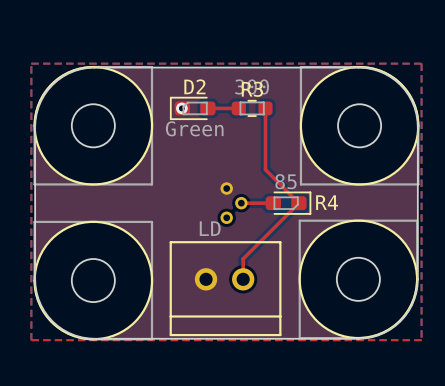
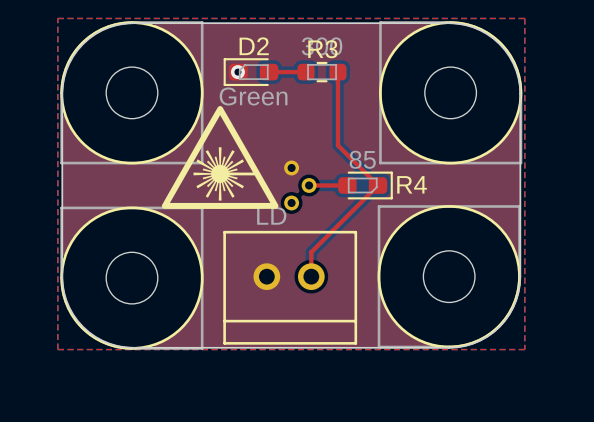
drawing: none -> [161, 106, 279, 209]

